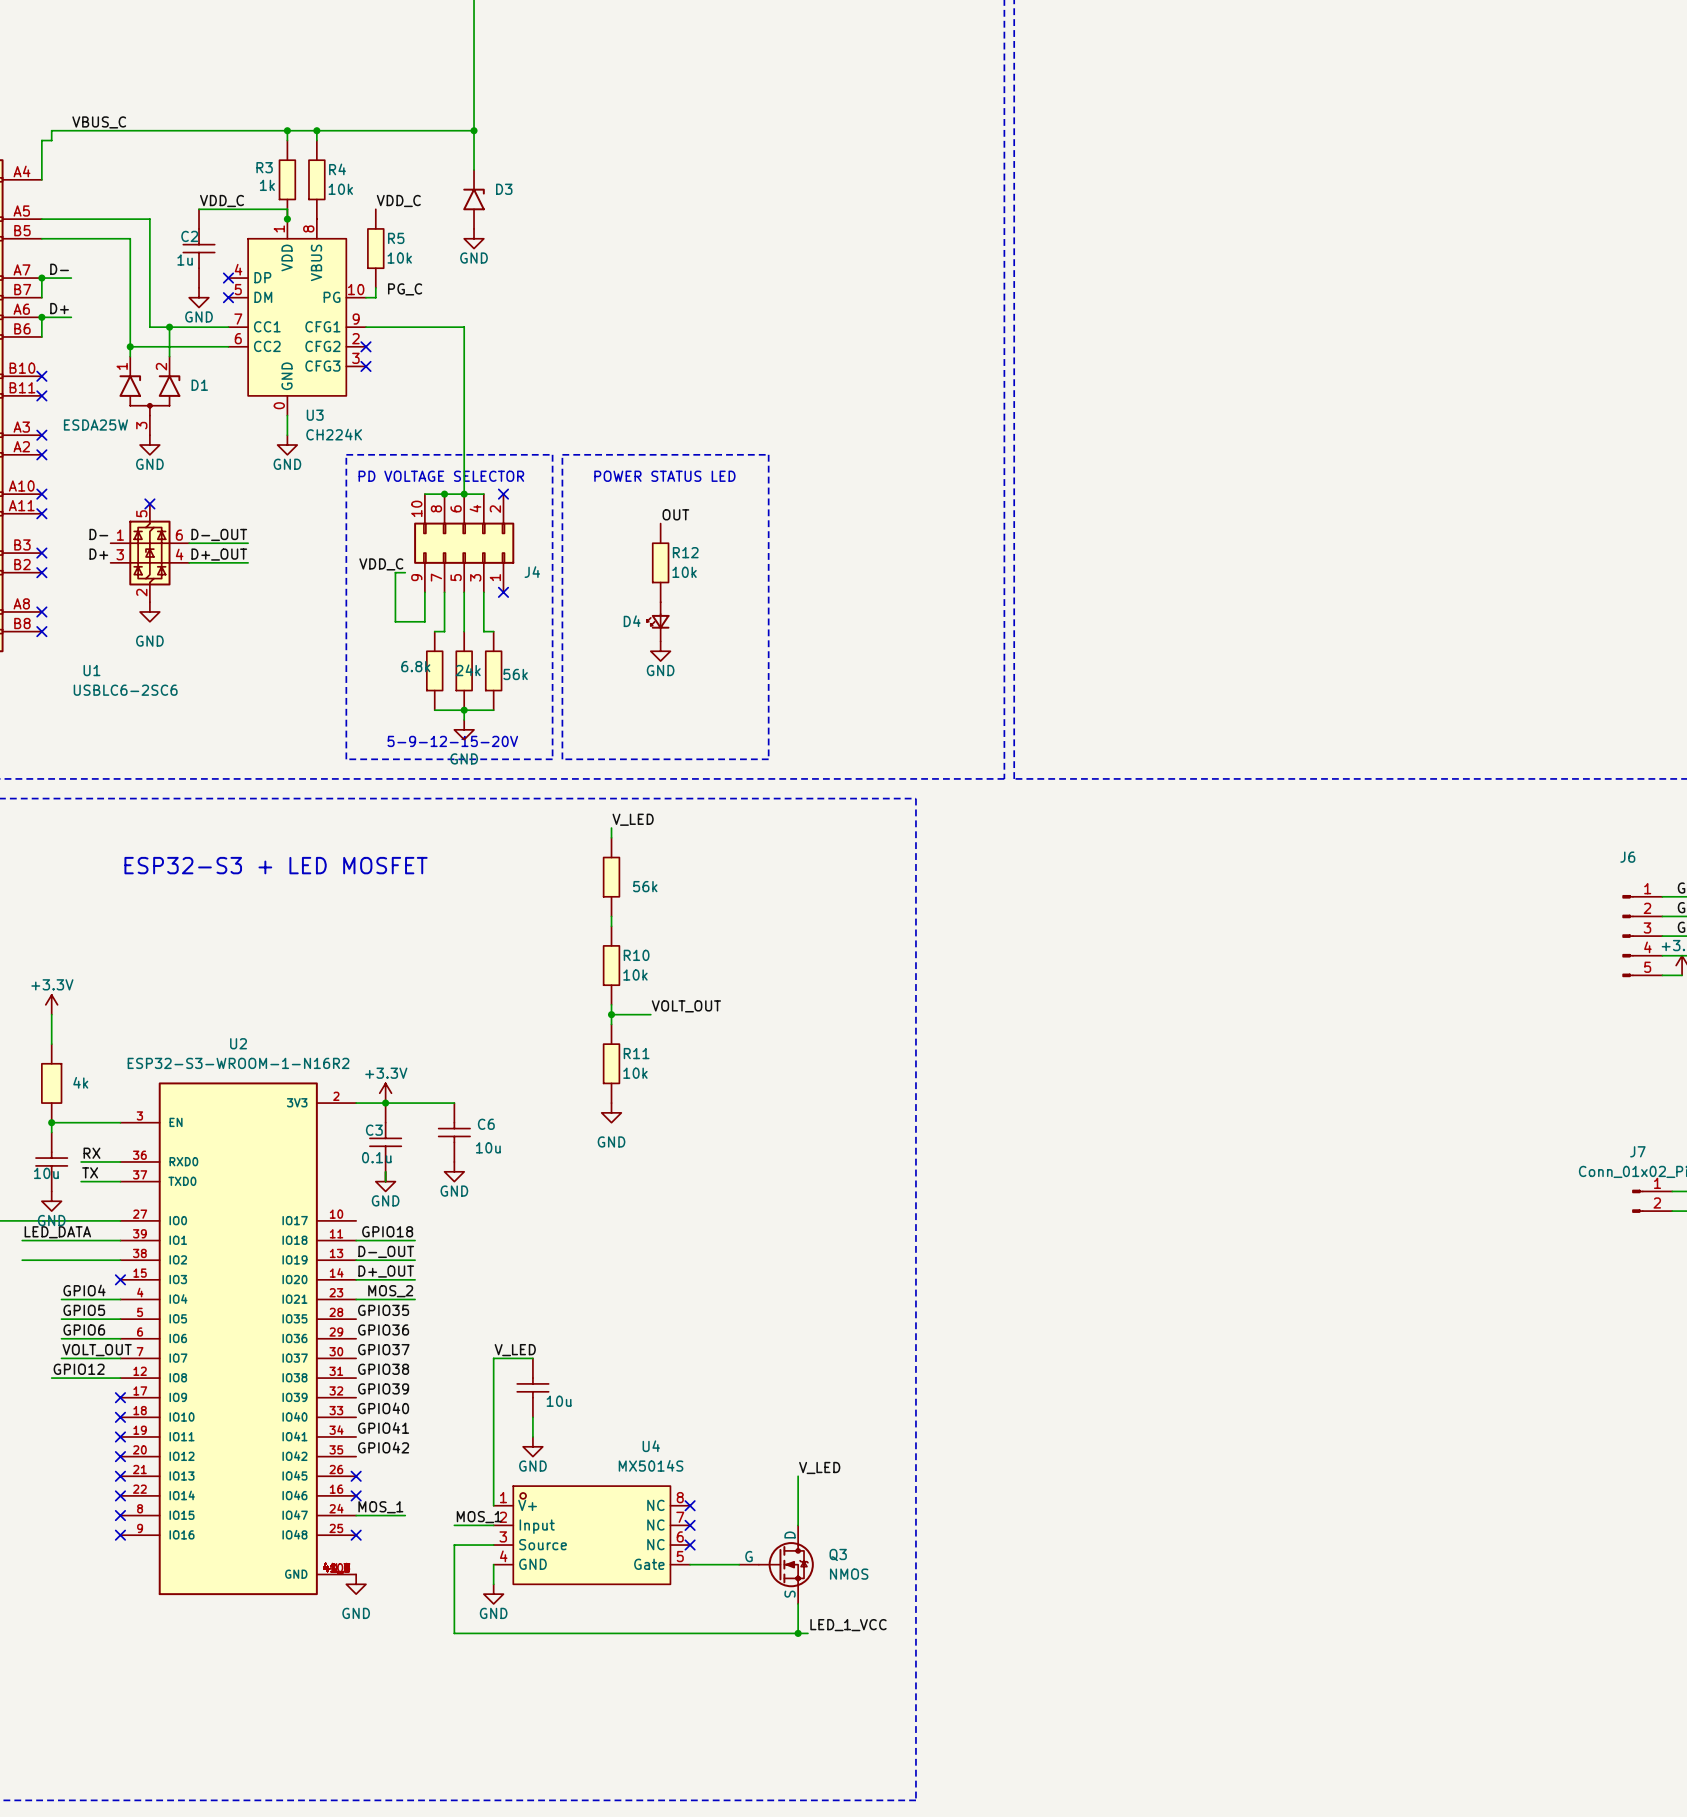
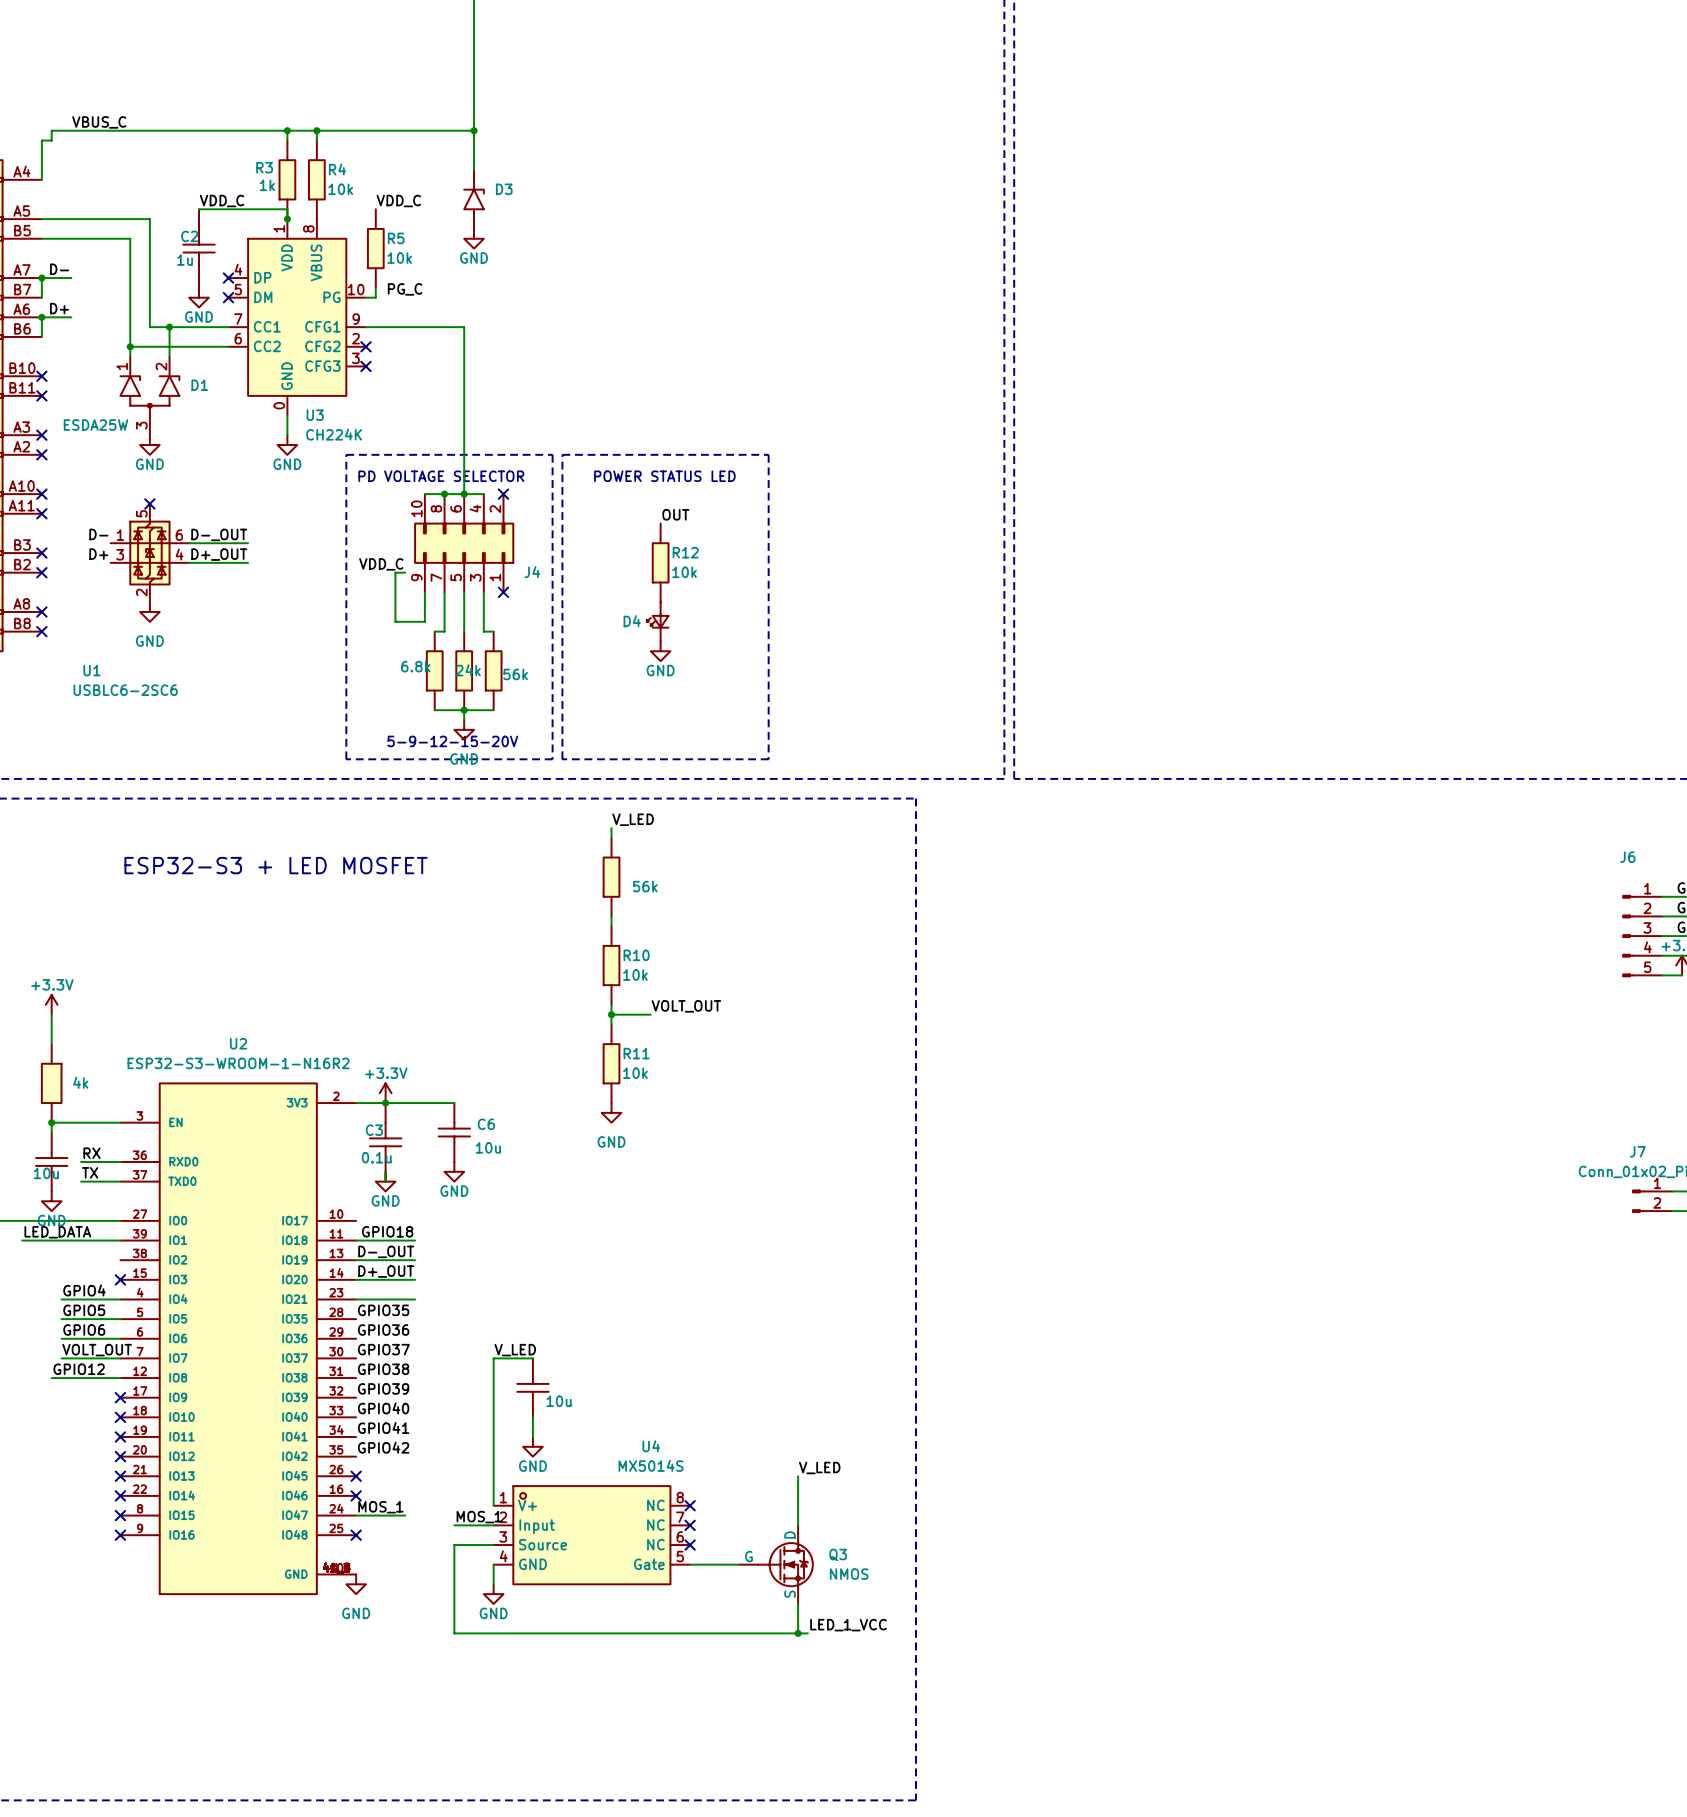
wire: (22, 1260) (120, 1260) -> none
label: MOS_2 (390, 1291) -> none

